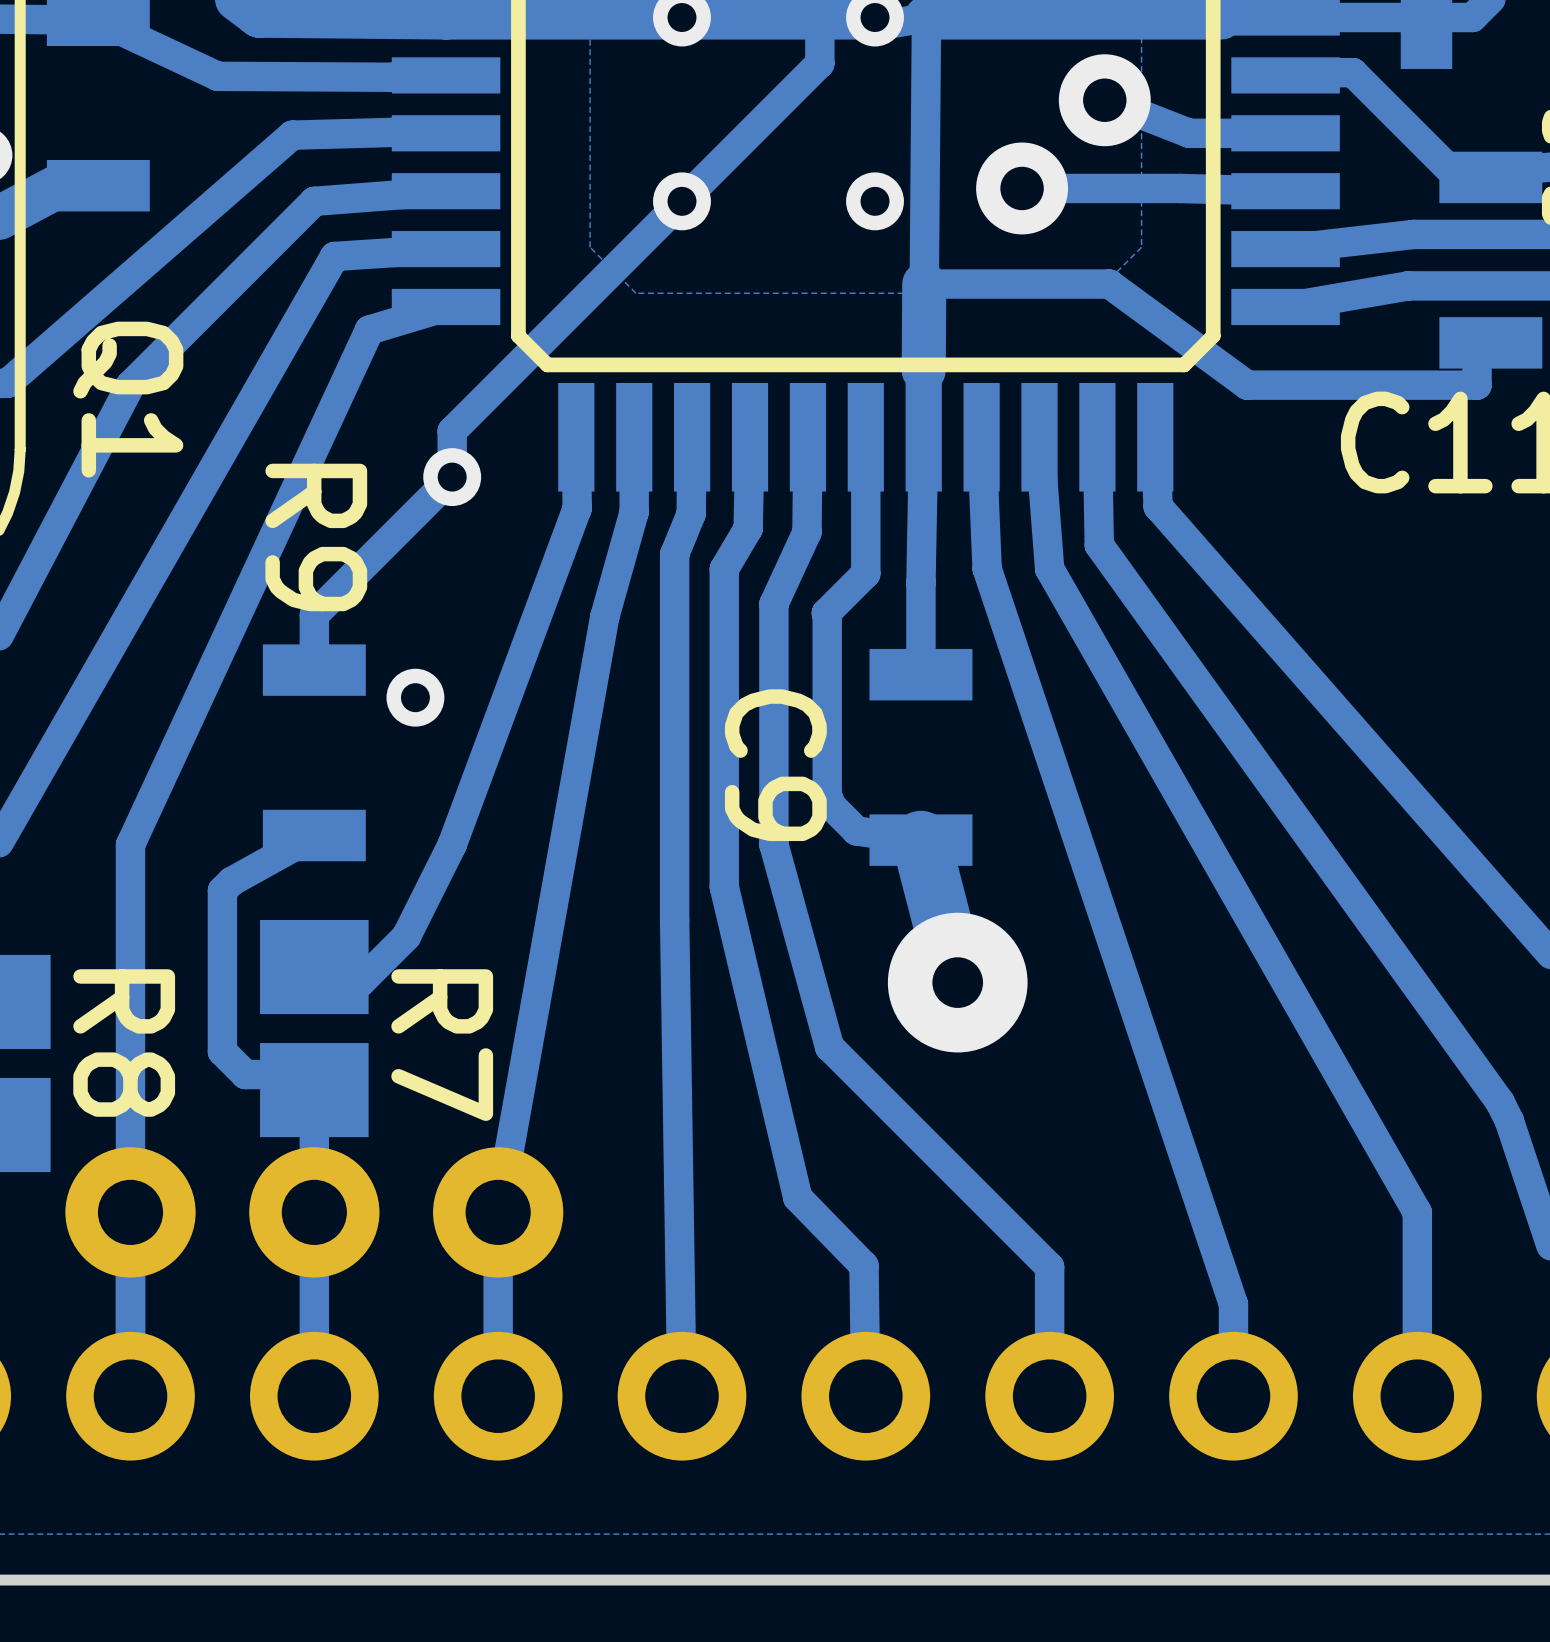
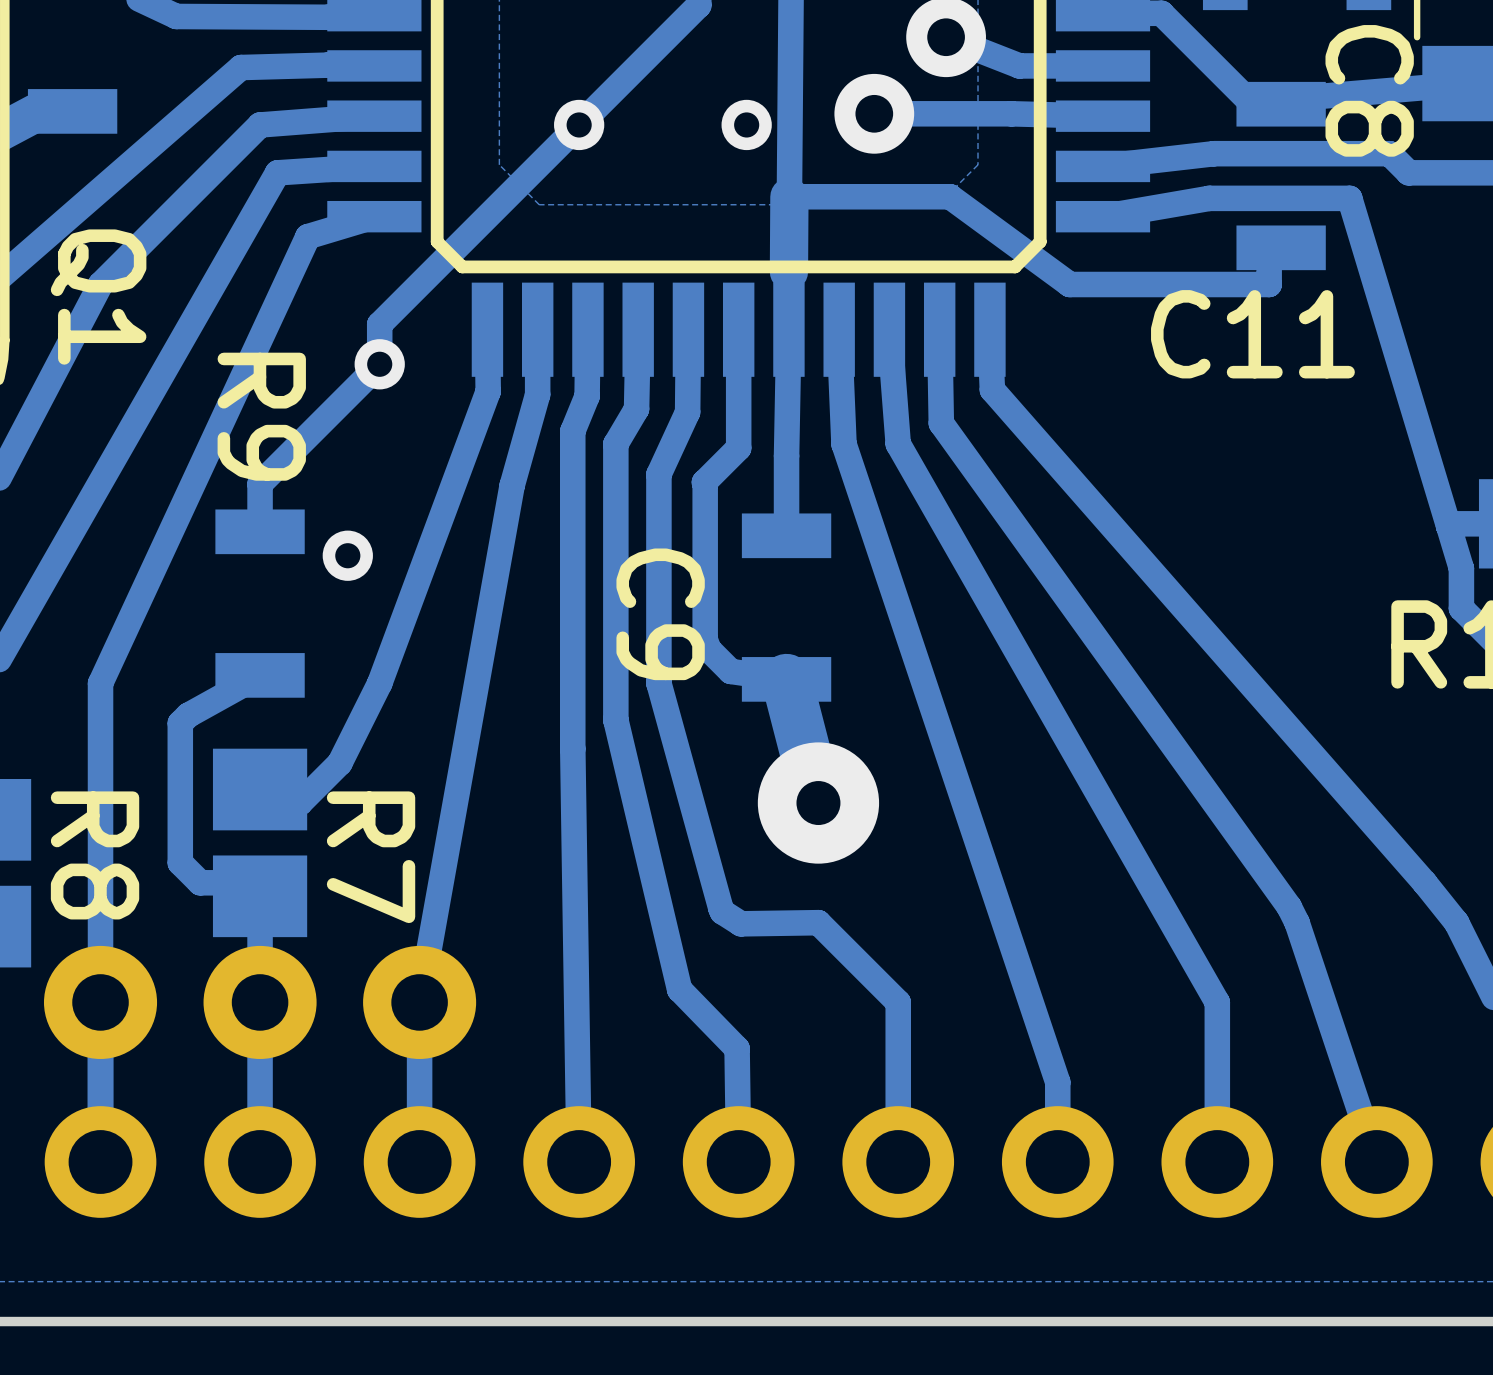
track: (829, 1046) (1049, 1267) -> (707, 858) (722, 912) (741, 923) (818, 922) (898, 1002) (898, 1049)

